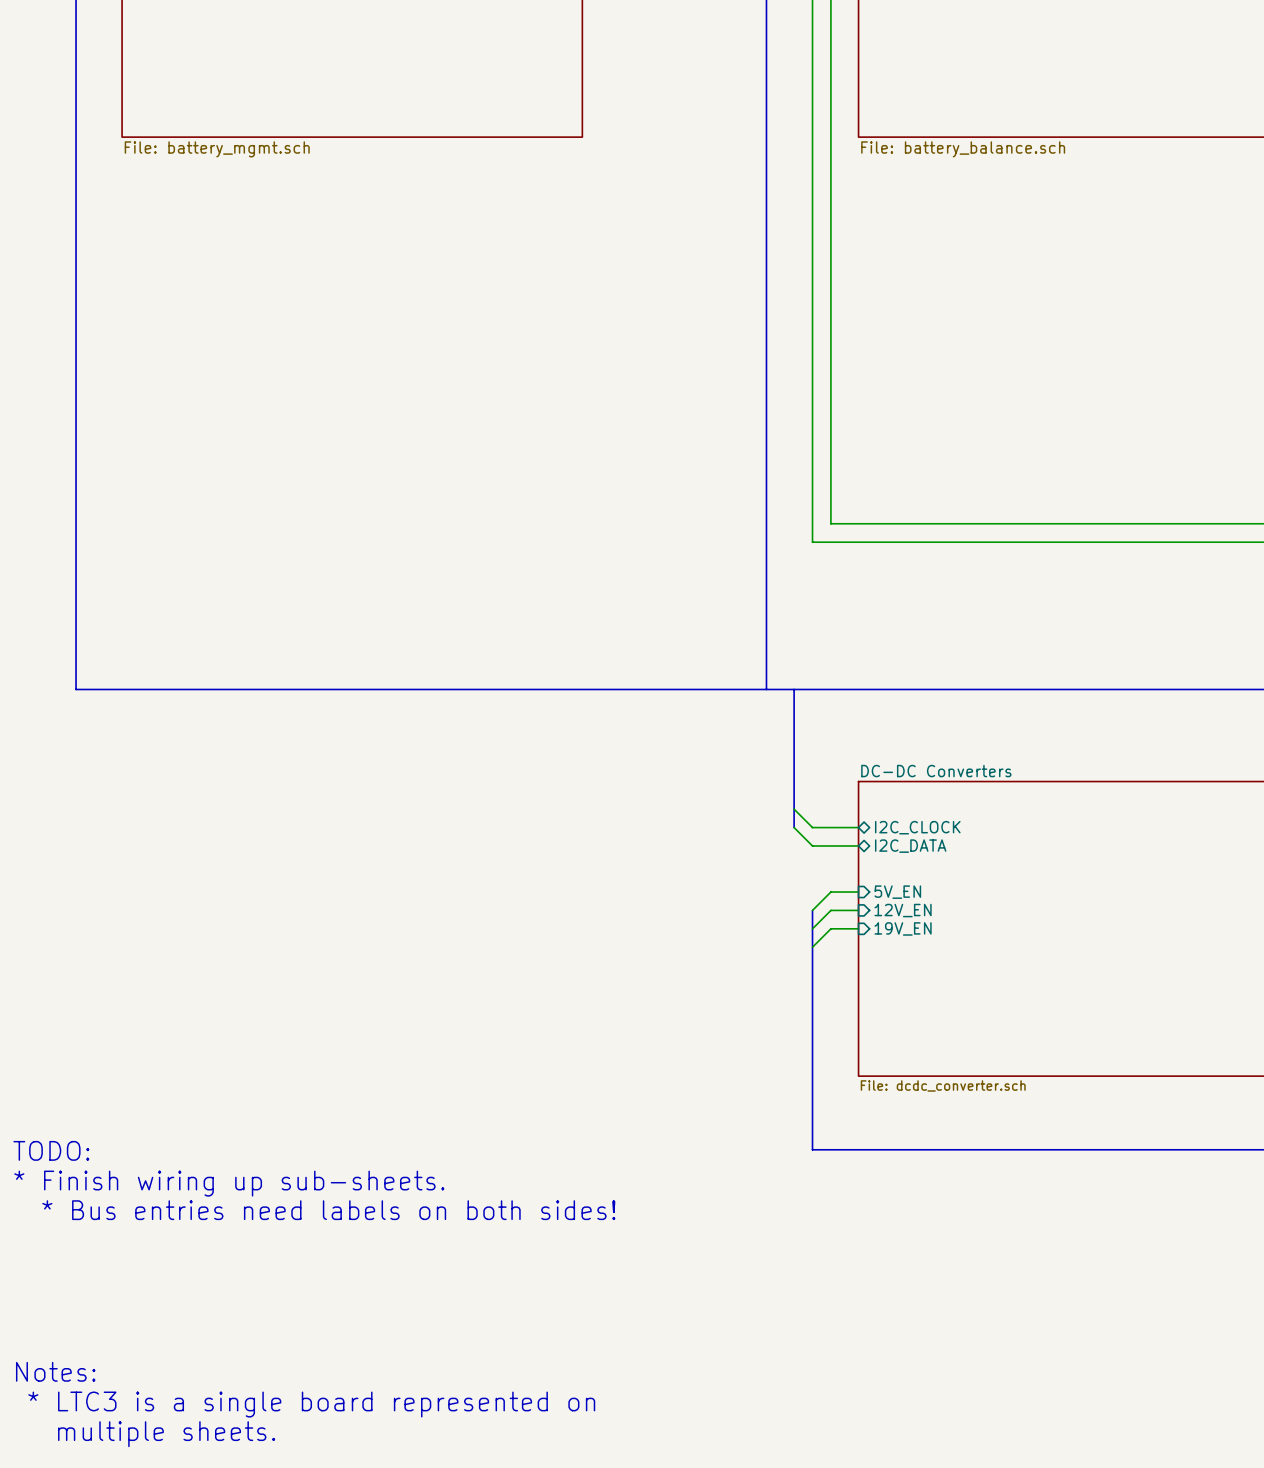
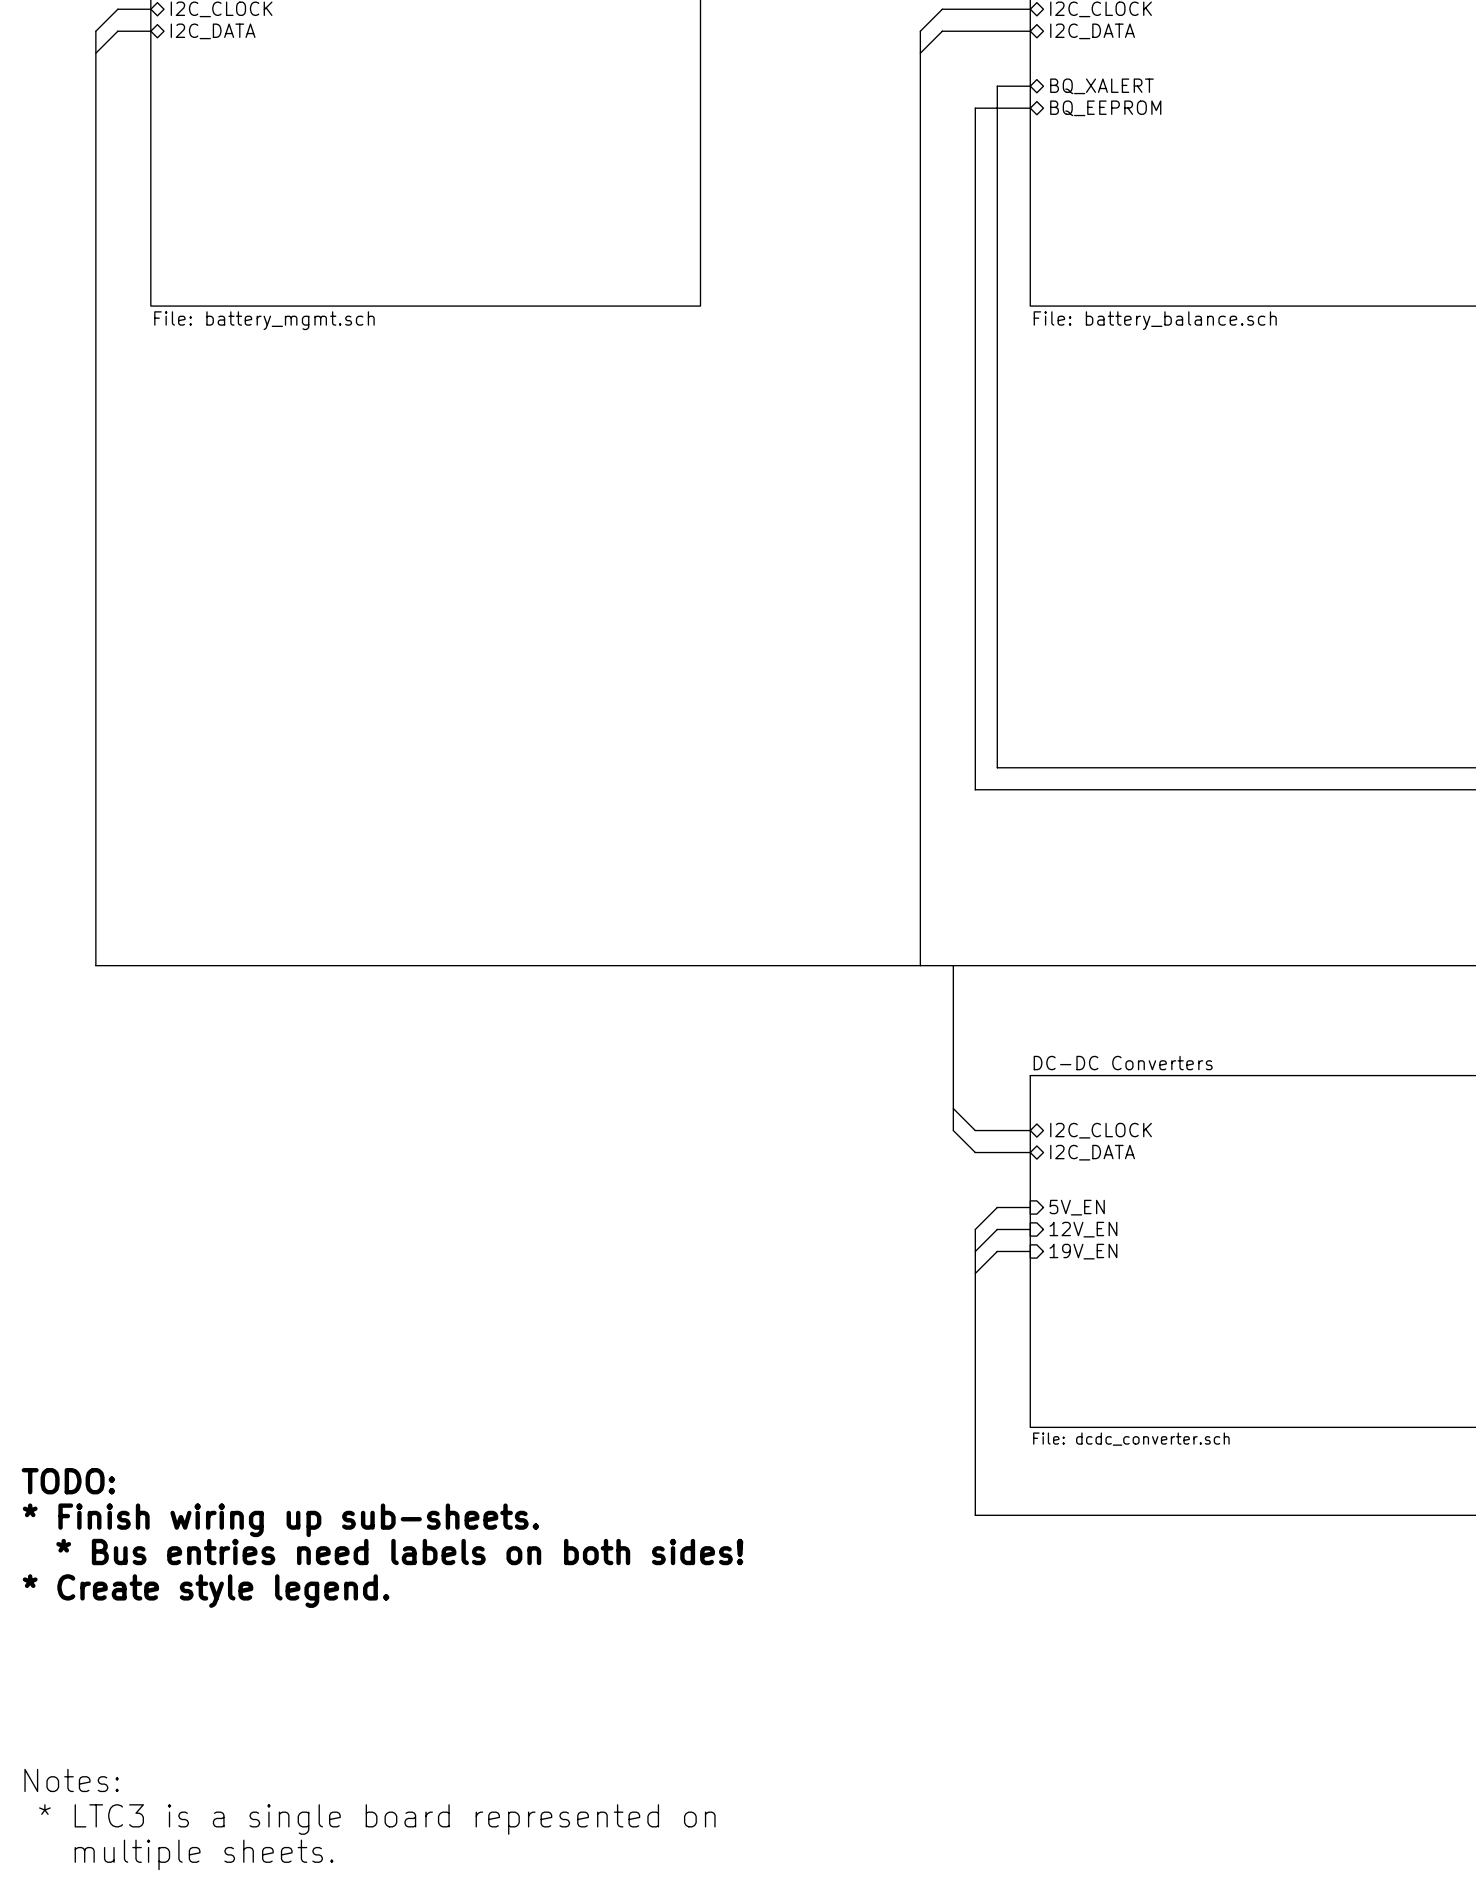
text: none -> TODO: (68, 1481)
text: TODO: (51, 1150) -> * Finish wiring up sub-sheets. (280, 1520)
text: * Finish wiring up sub-sheets. (229, 1183) -> * Bus entries need labels on both sides! (399, 1552)
text: * Bus entries need labels on both sides! (328, 1210) -> * Create style legend. (206, 1591)

